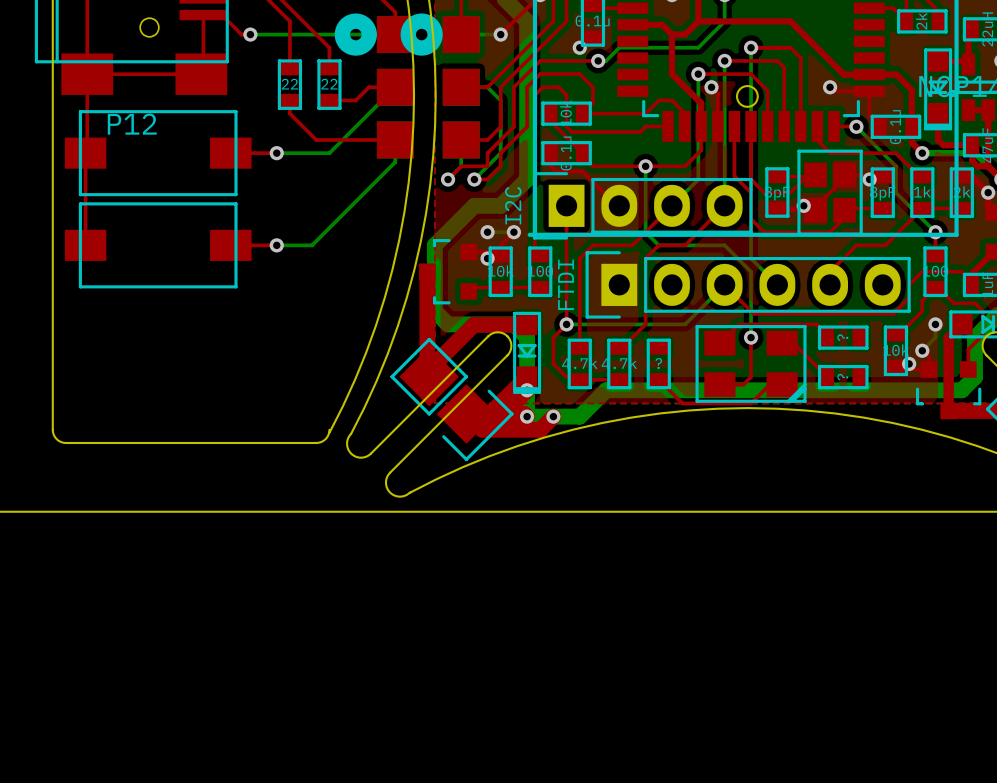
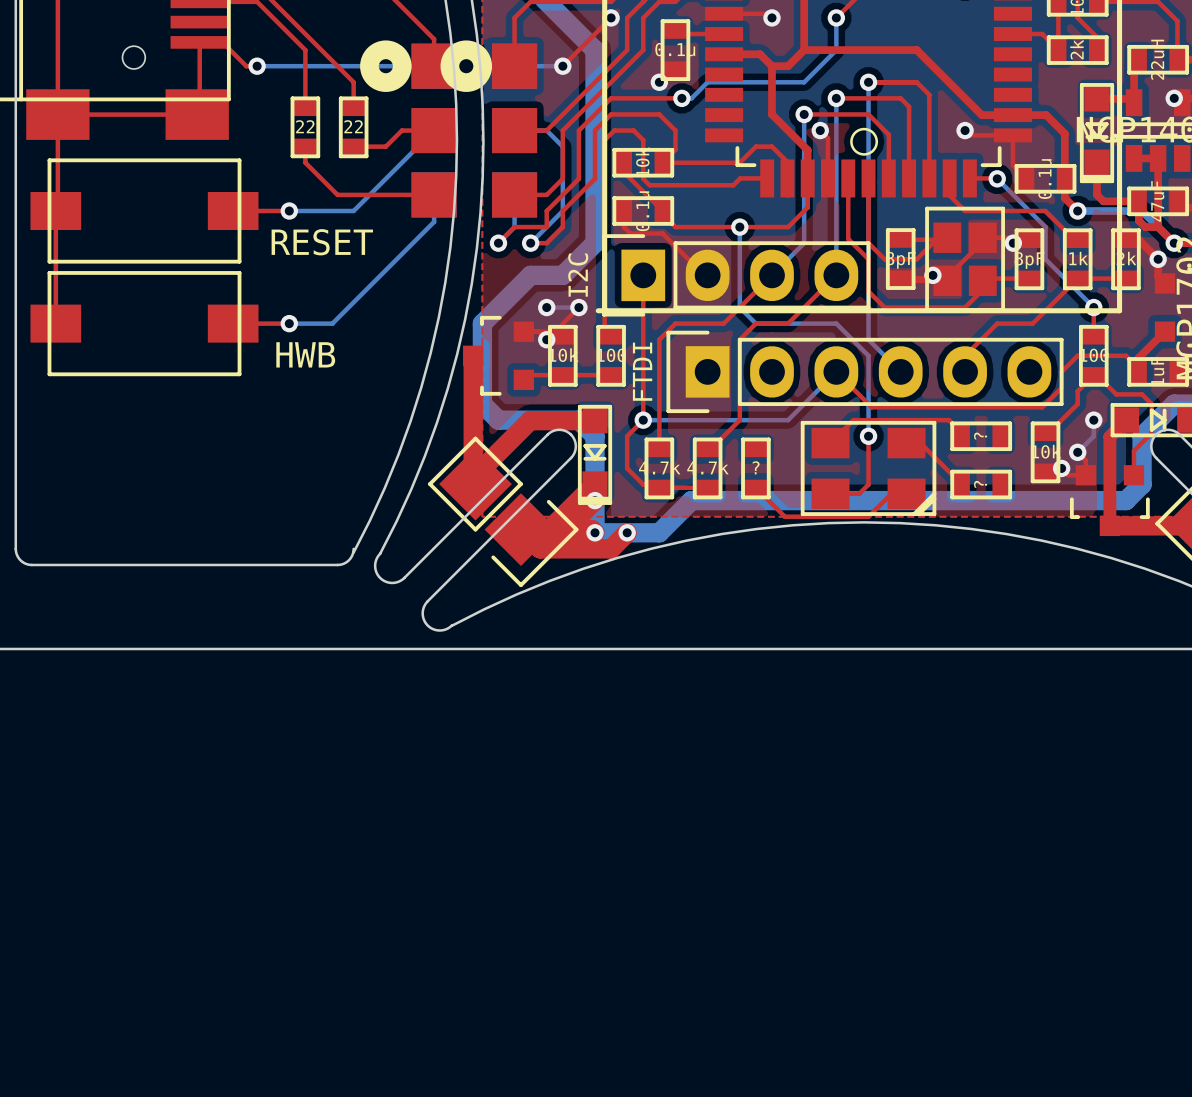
round board edge: [735, 85, 759, 108] -> none
drawing: none -> [850, 127, 879, 156]
P12 name: P12 (132, 124) -> none
part value: none -> RESET (322, 242)
part value: none -> HWB (305, 354)

